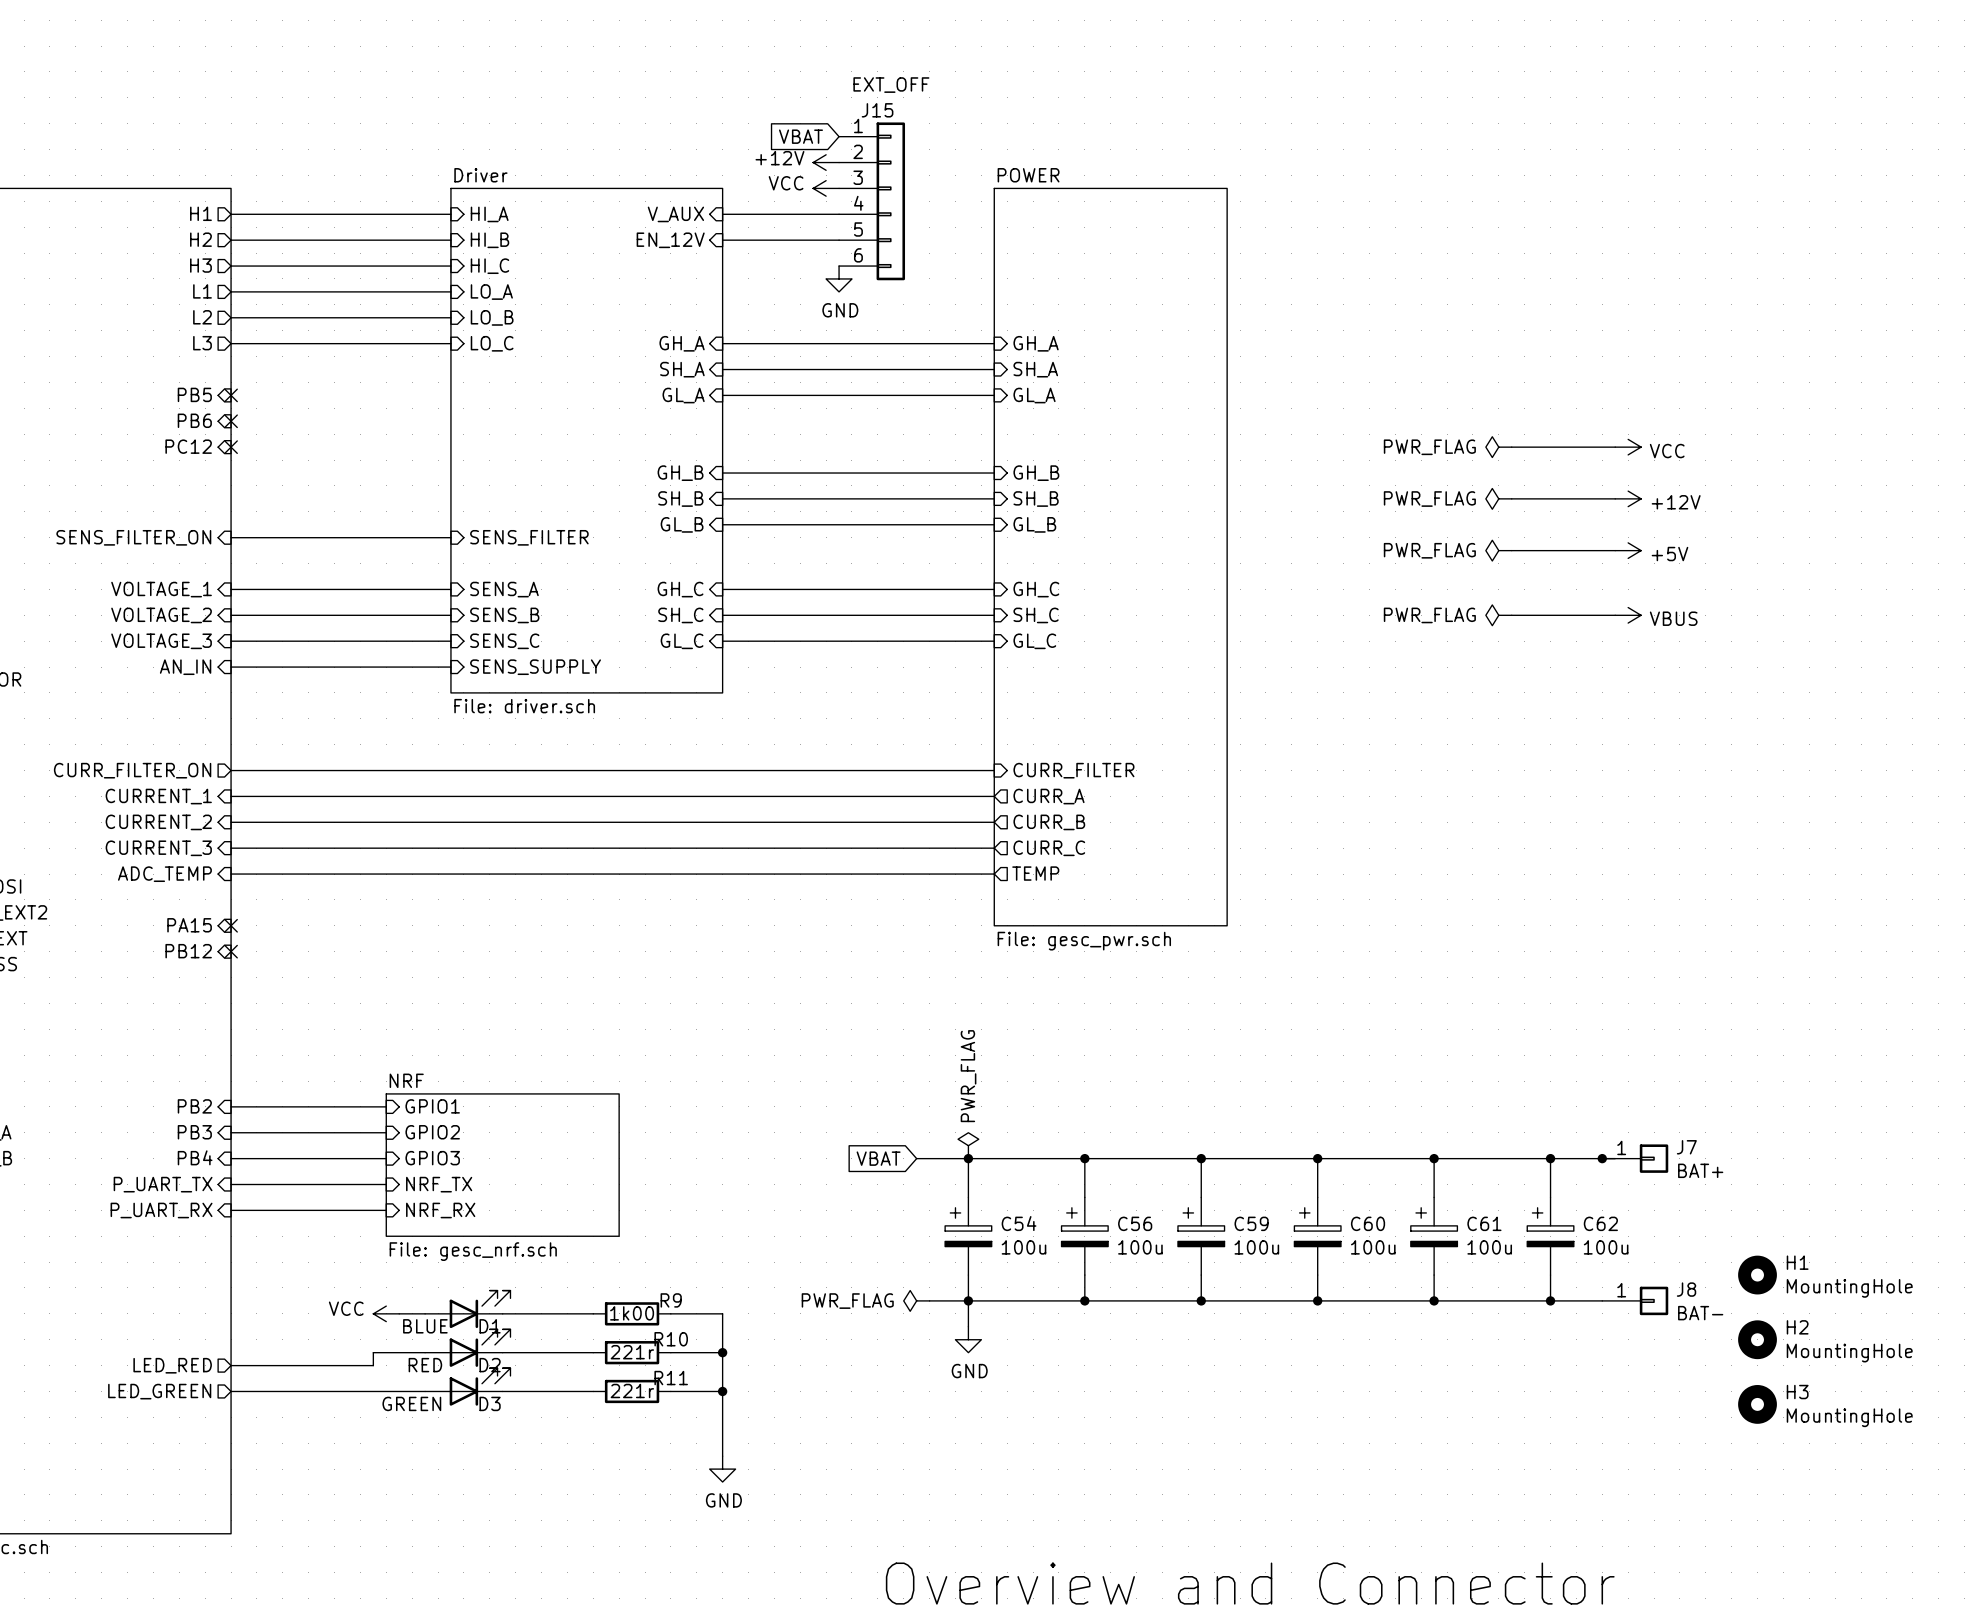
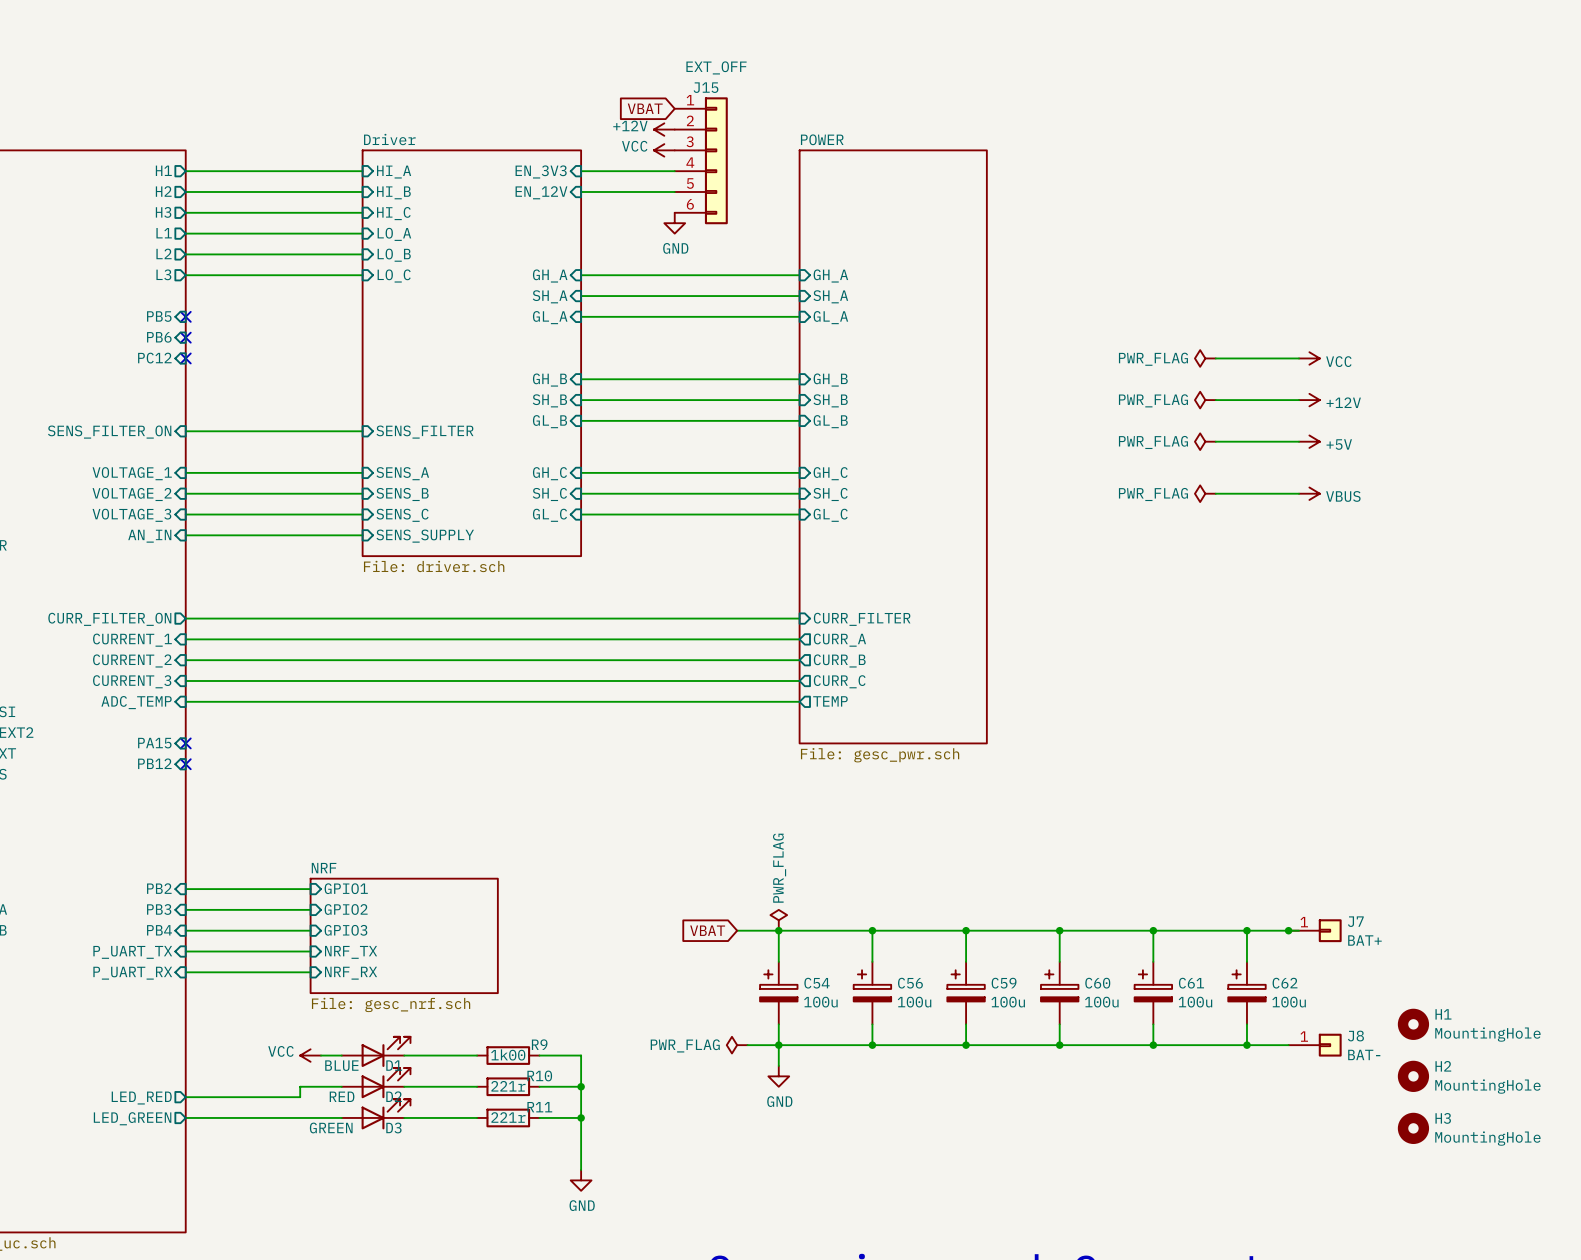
sheet pin: V_AUX (675, 214) -> EN_3V3 (541, 171)

